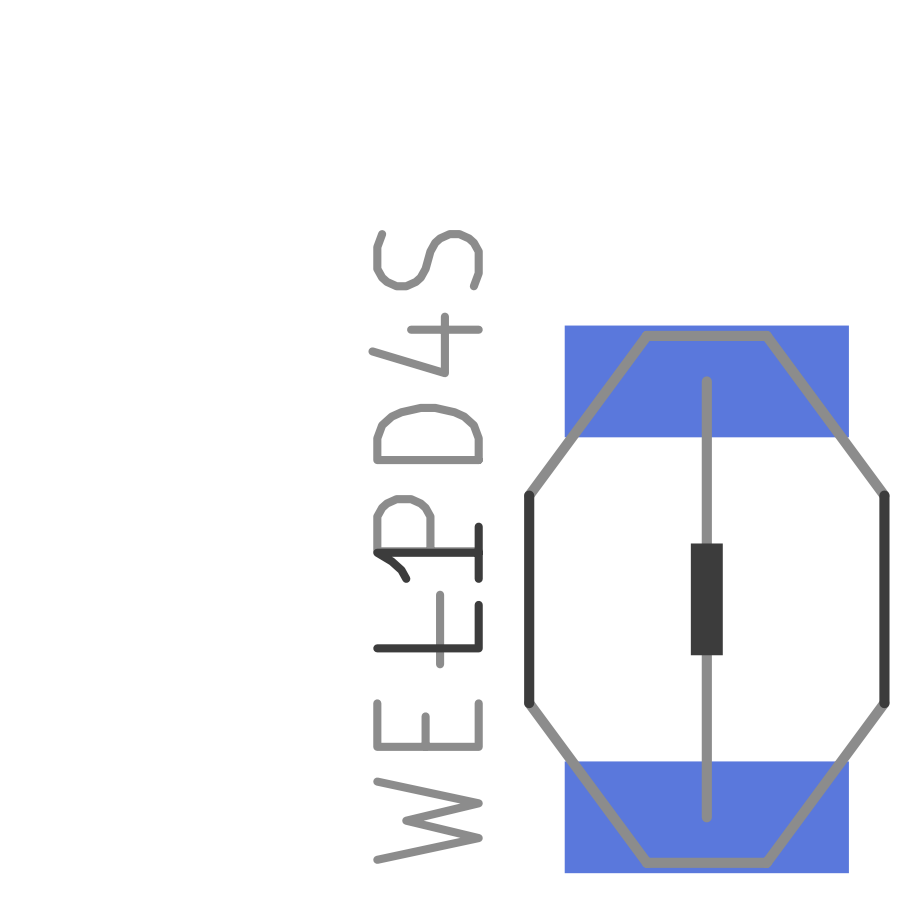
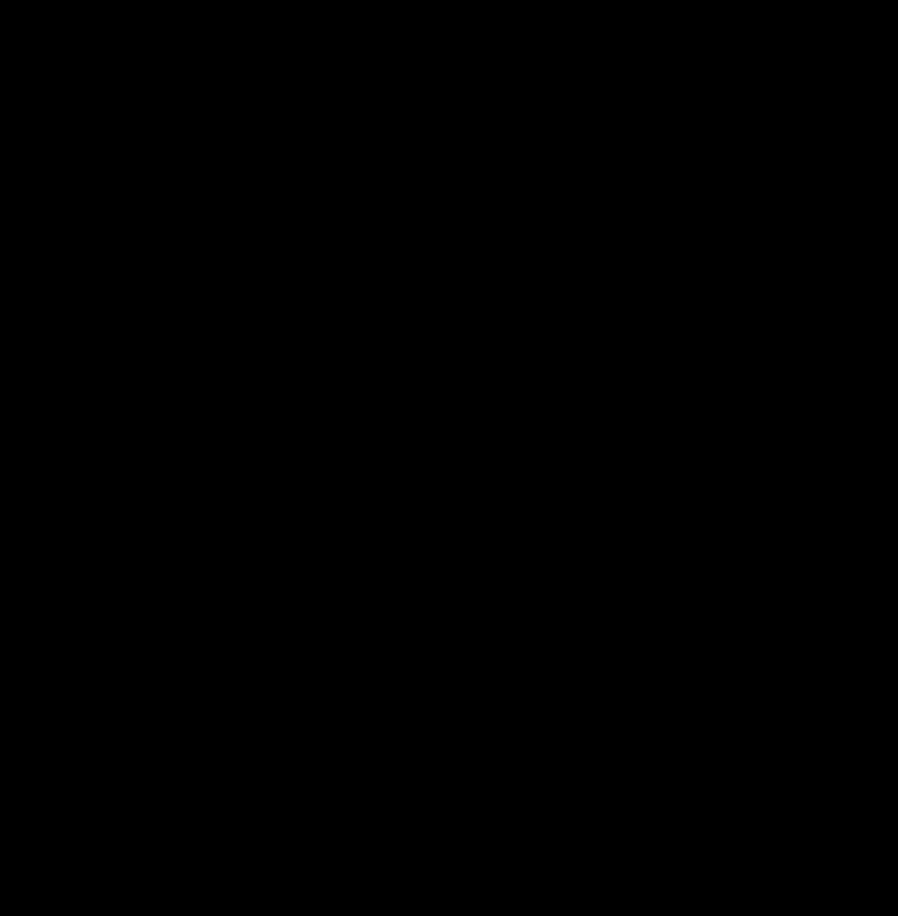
L1: WE-PD4S (706, 599) -> none

